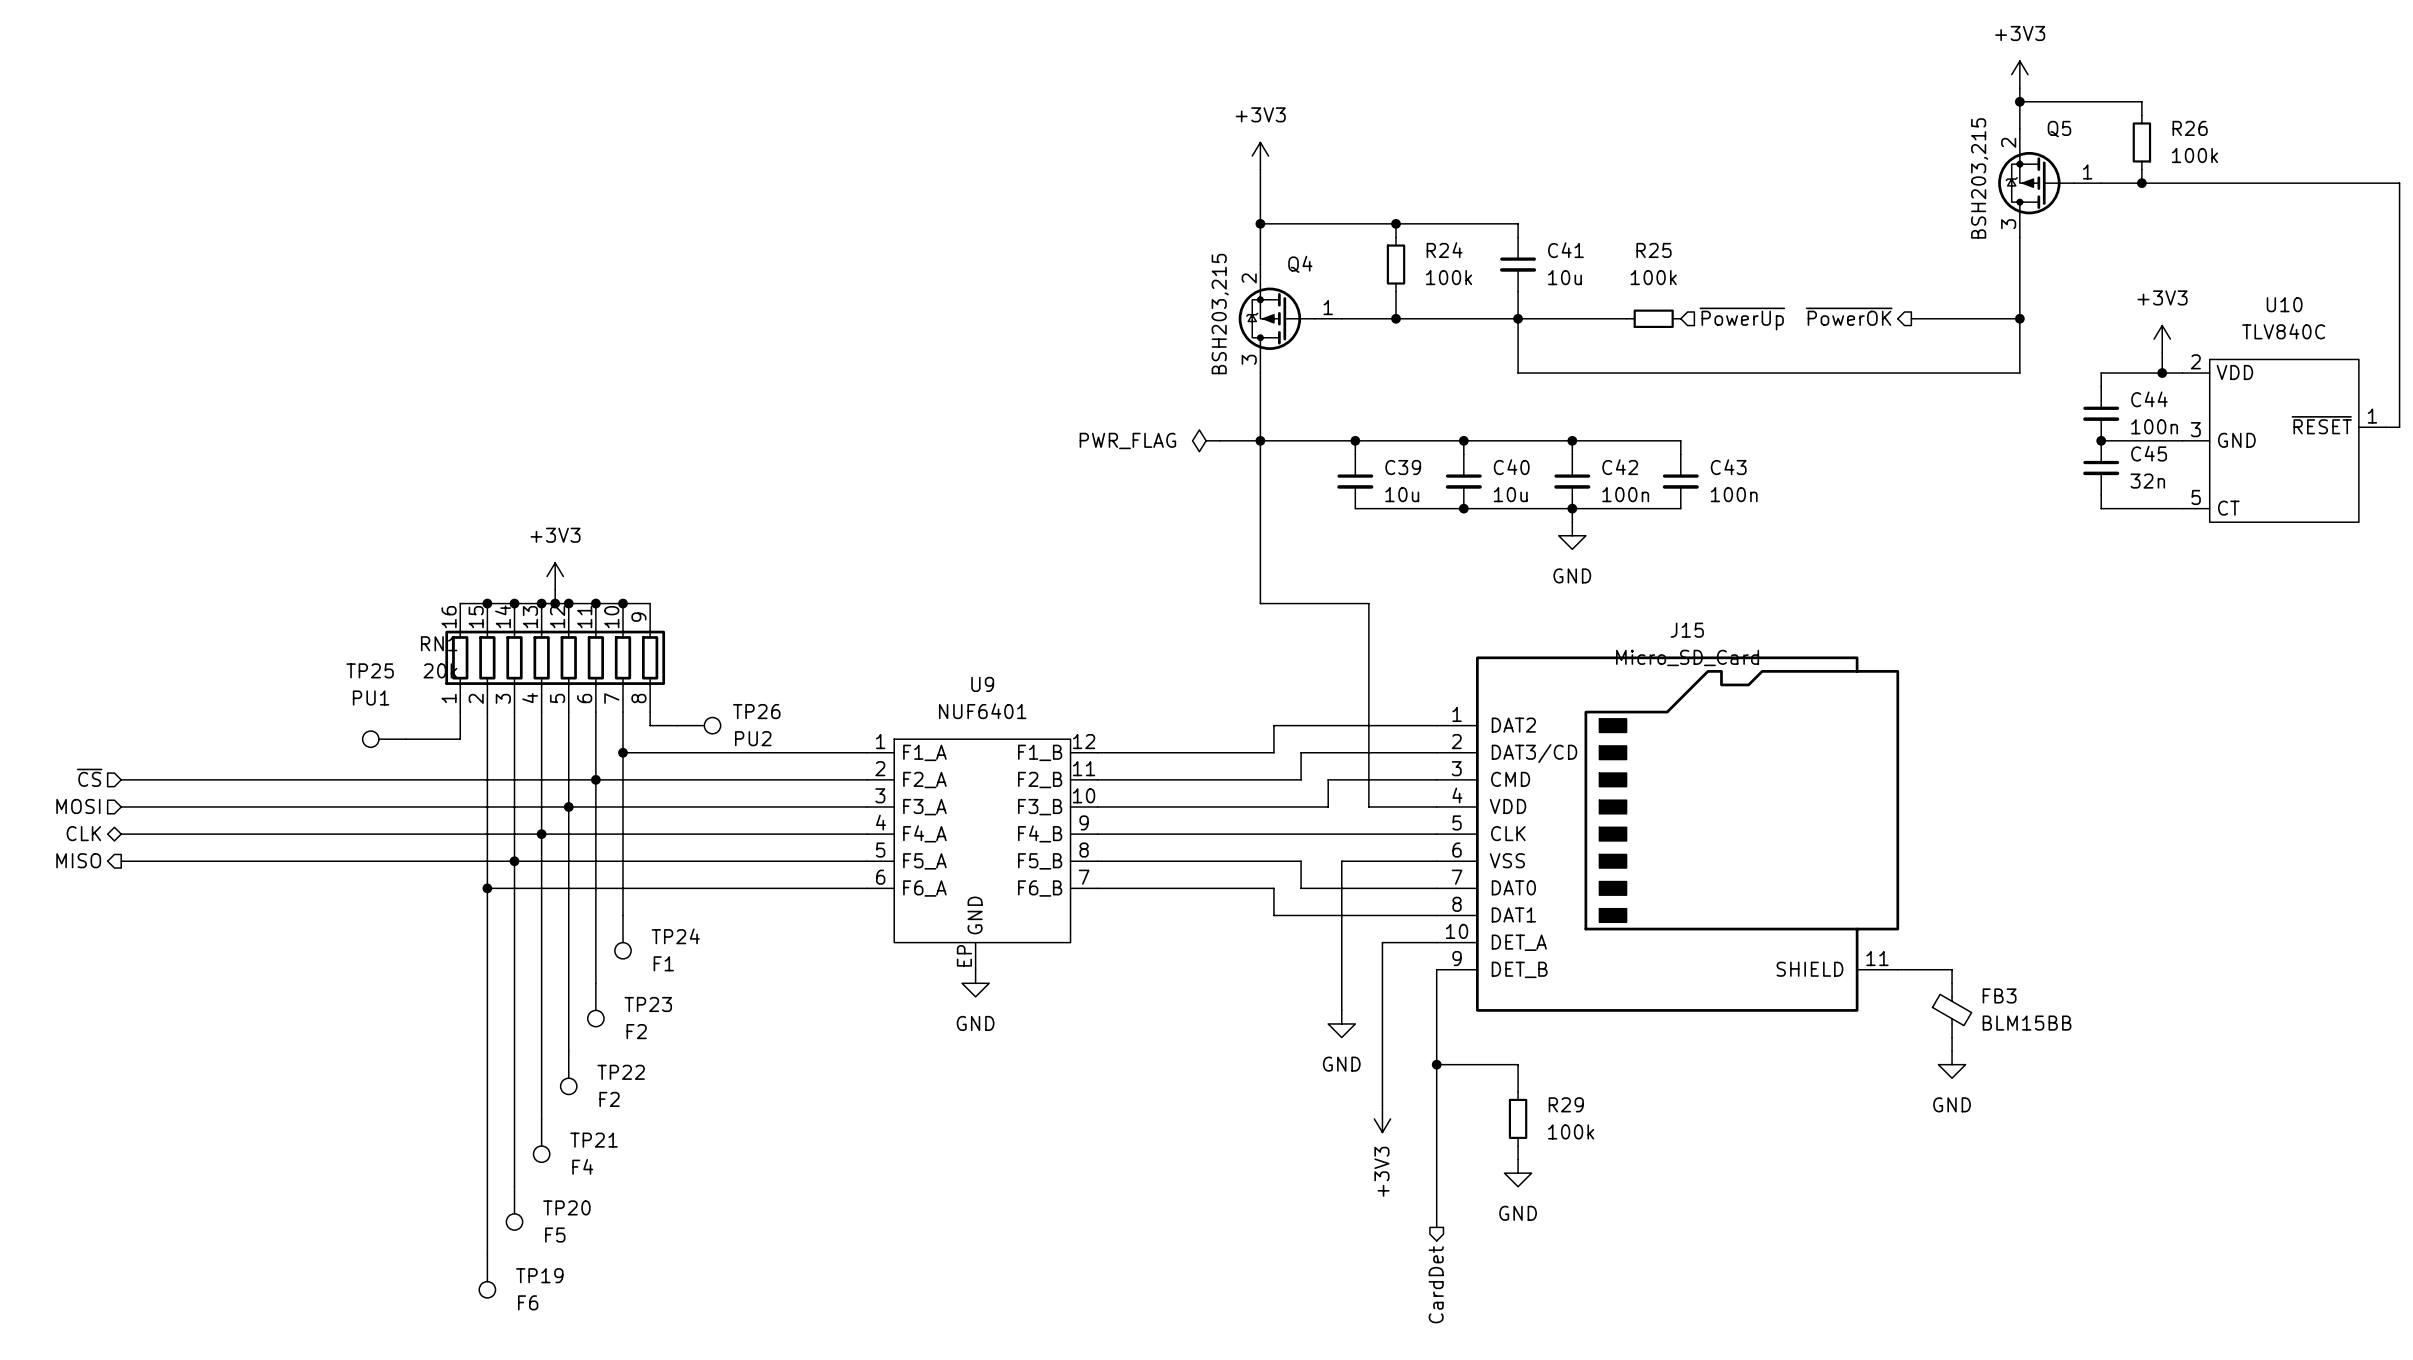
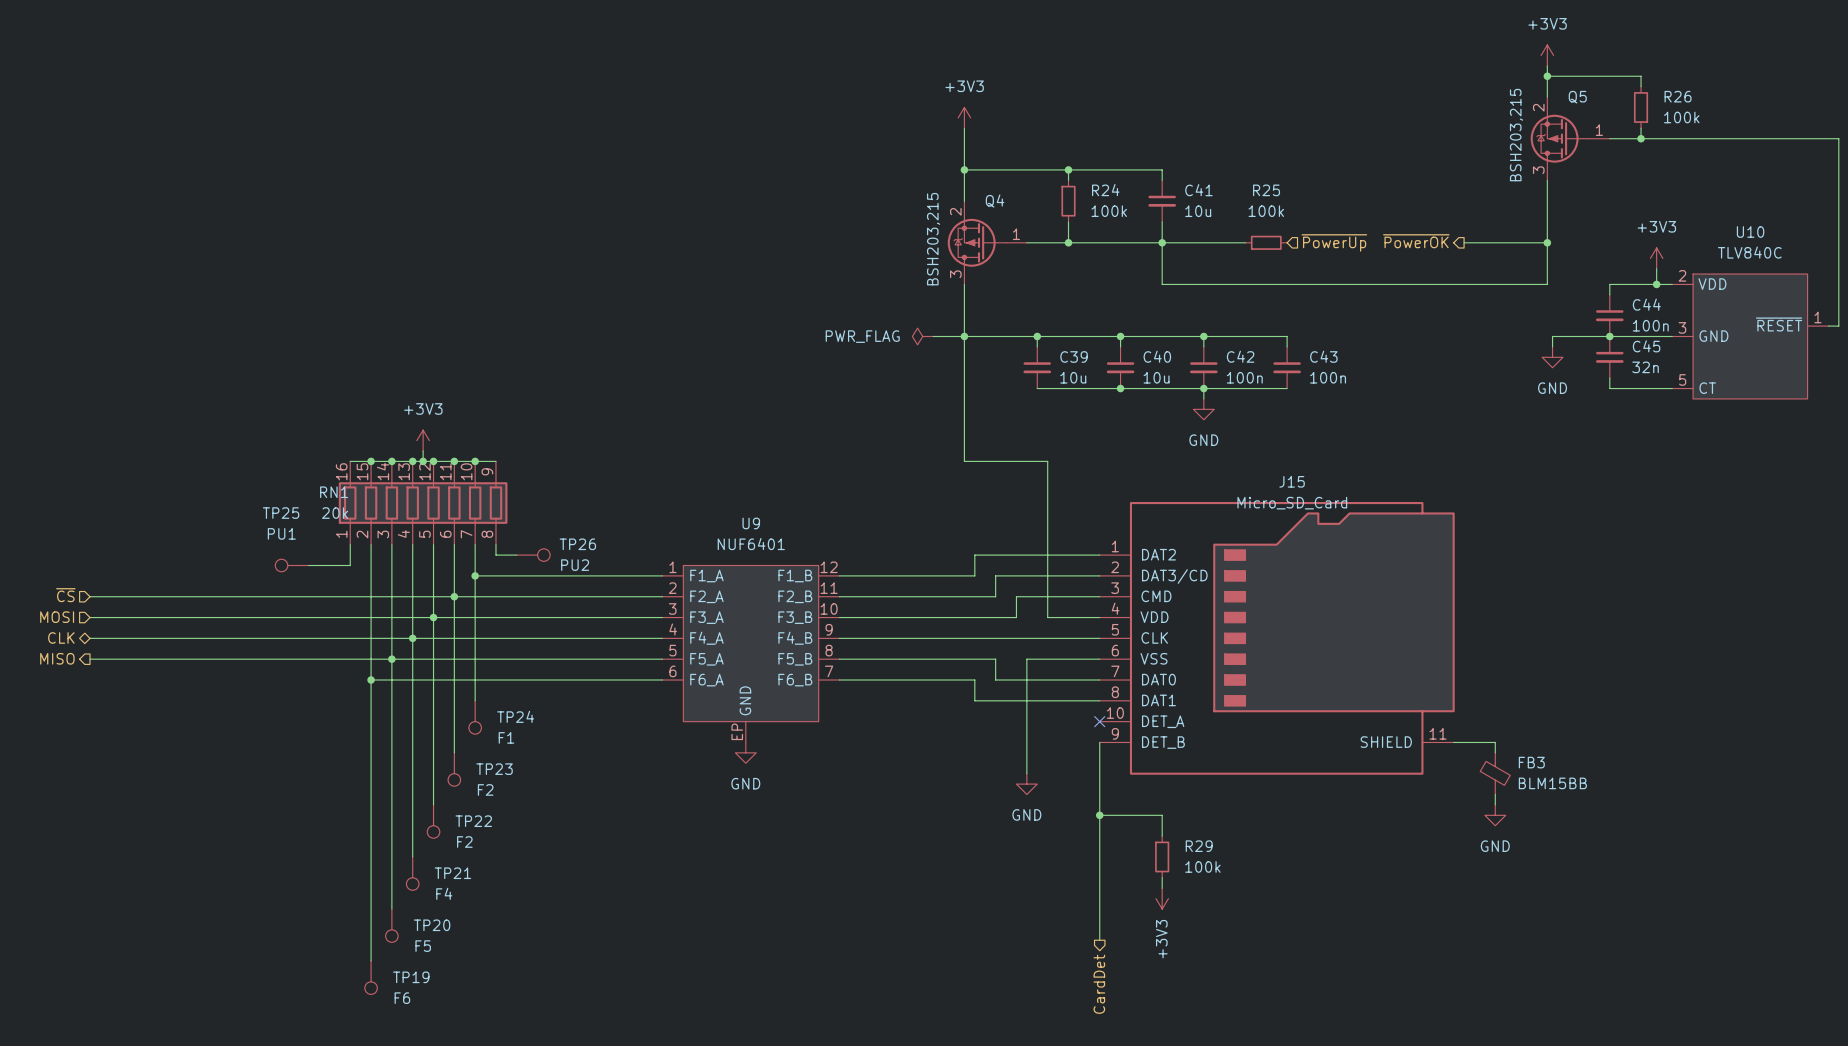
wire: none -> (1609, 336) (1552, 336) (1552, 346)
power symbol: none -> GND (1552, 357)
wire: (1436, 942) (1382, 942) (1382, 1105) -> none
no-connect mark: none -> (1099, 721)
power symbol: +3V3 (1382, 1118) -> none
power symbol: GND (1518, 1173) -> +3V3 (1162, 898)

